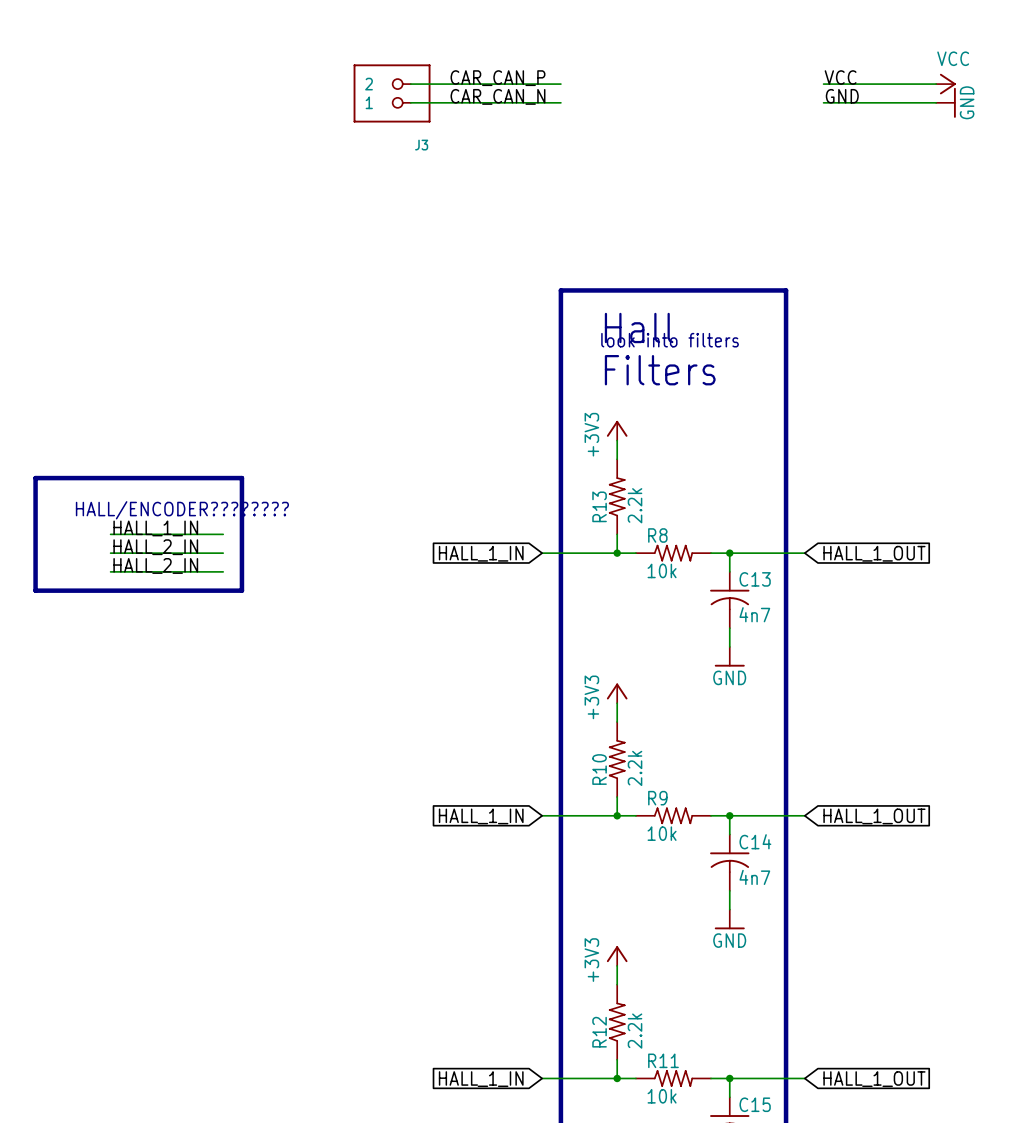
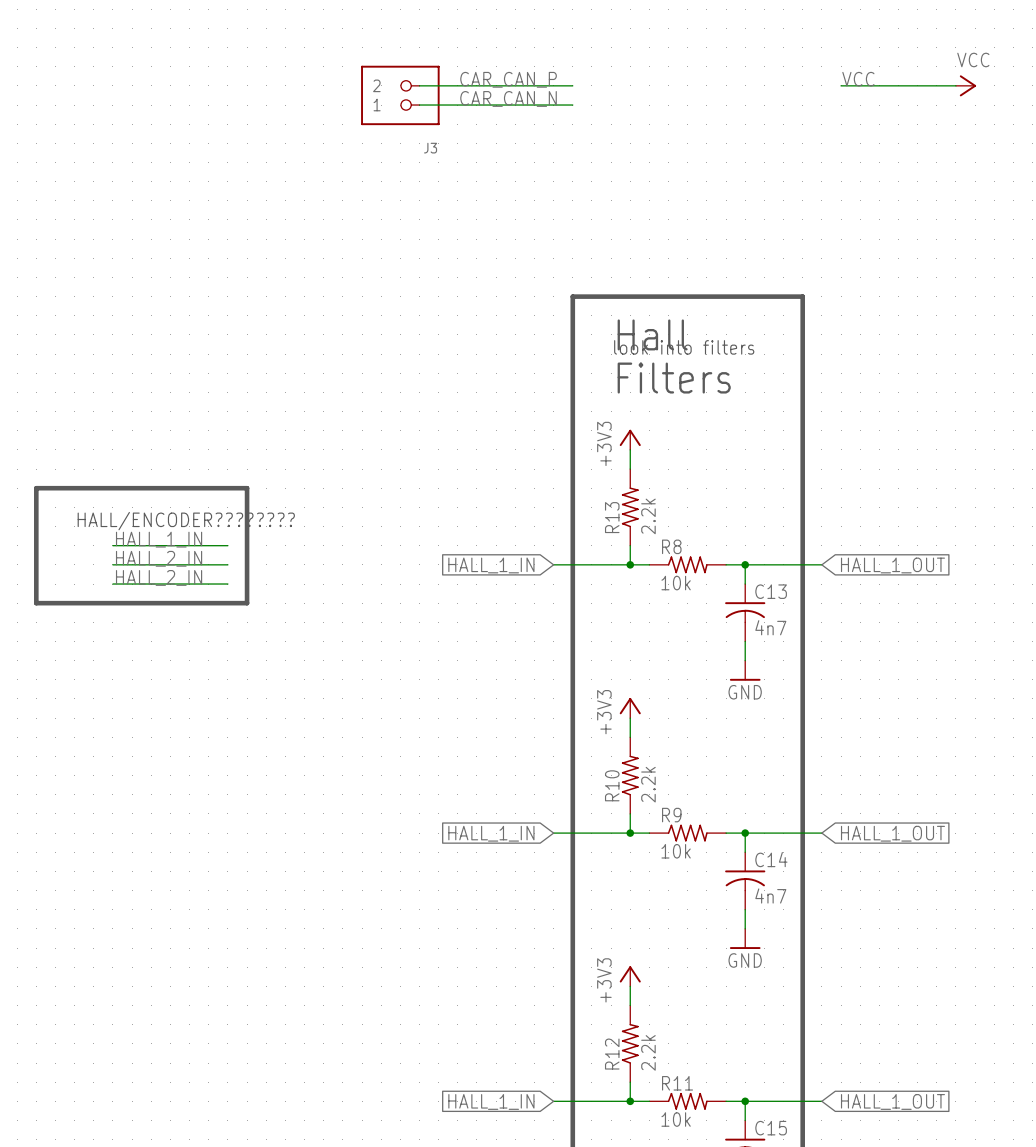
label: GND (842, 96) -> none
wire: (823, 102) (936, 102) -> none
power symbol: GND (946, 102) -> none

